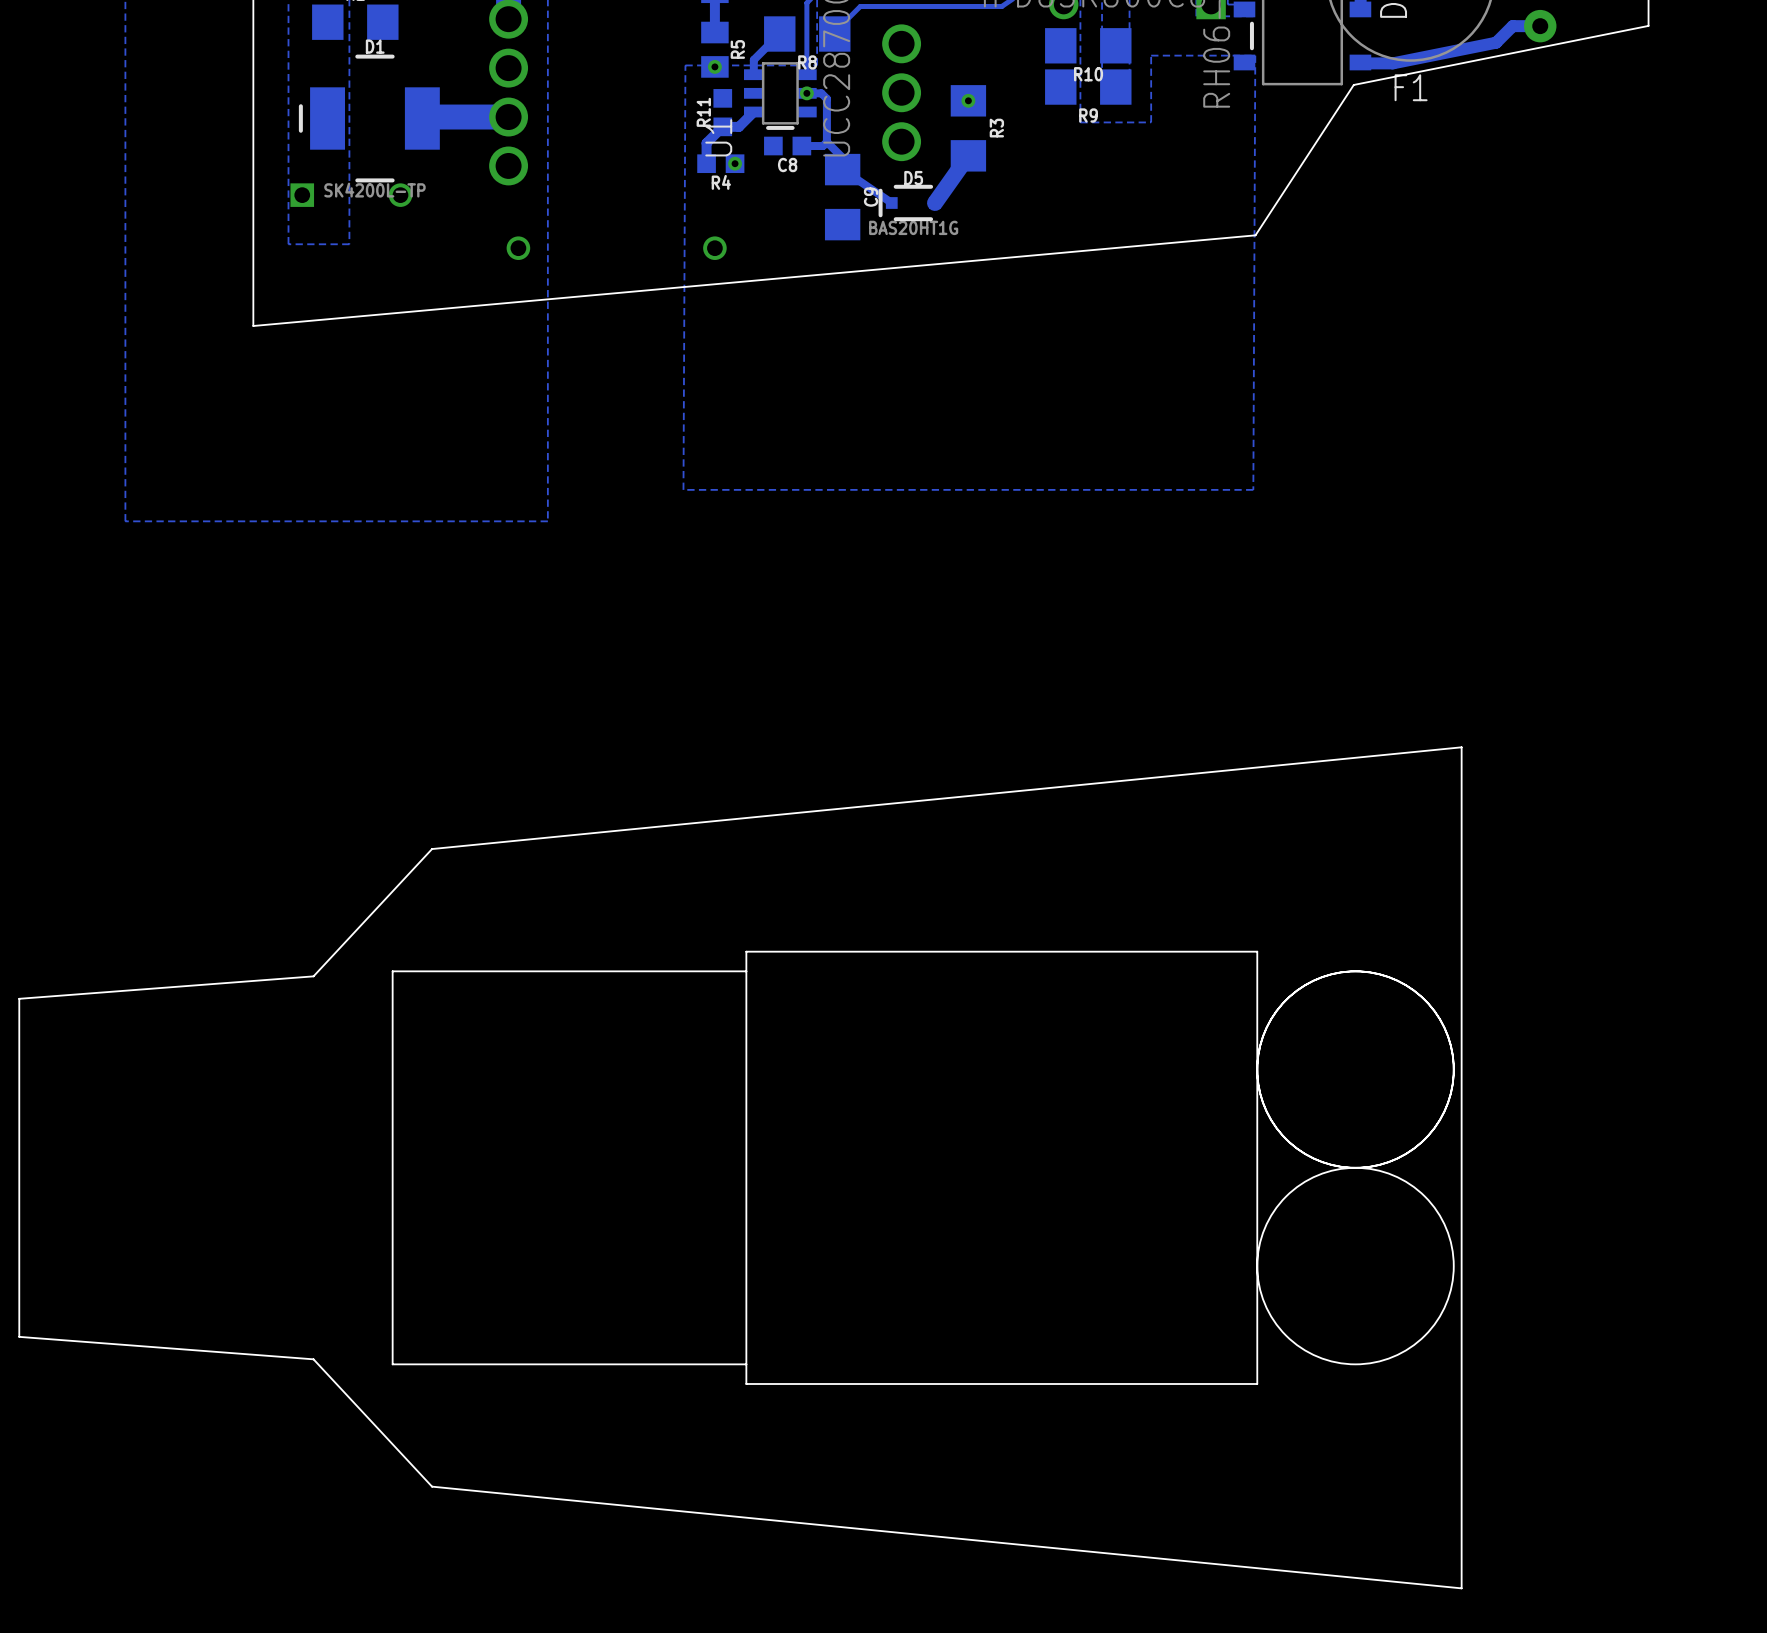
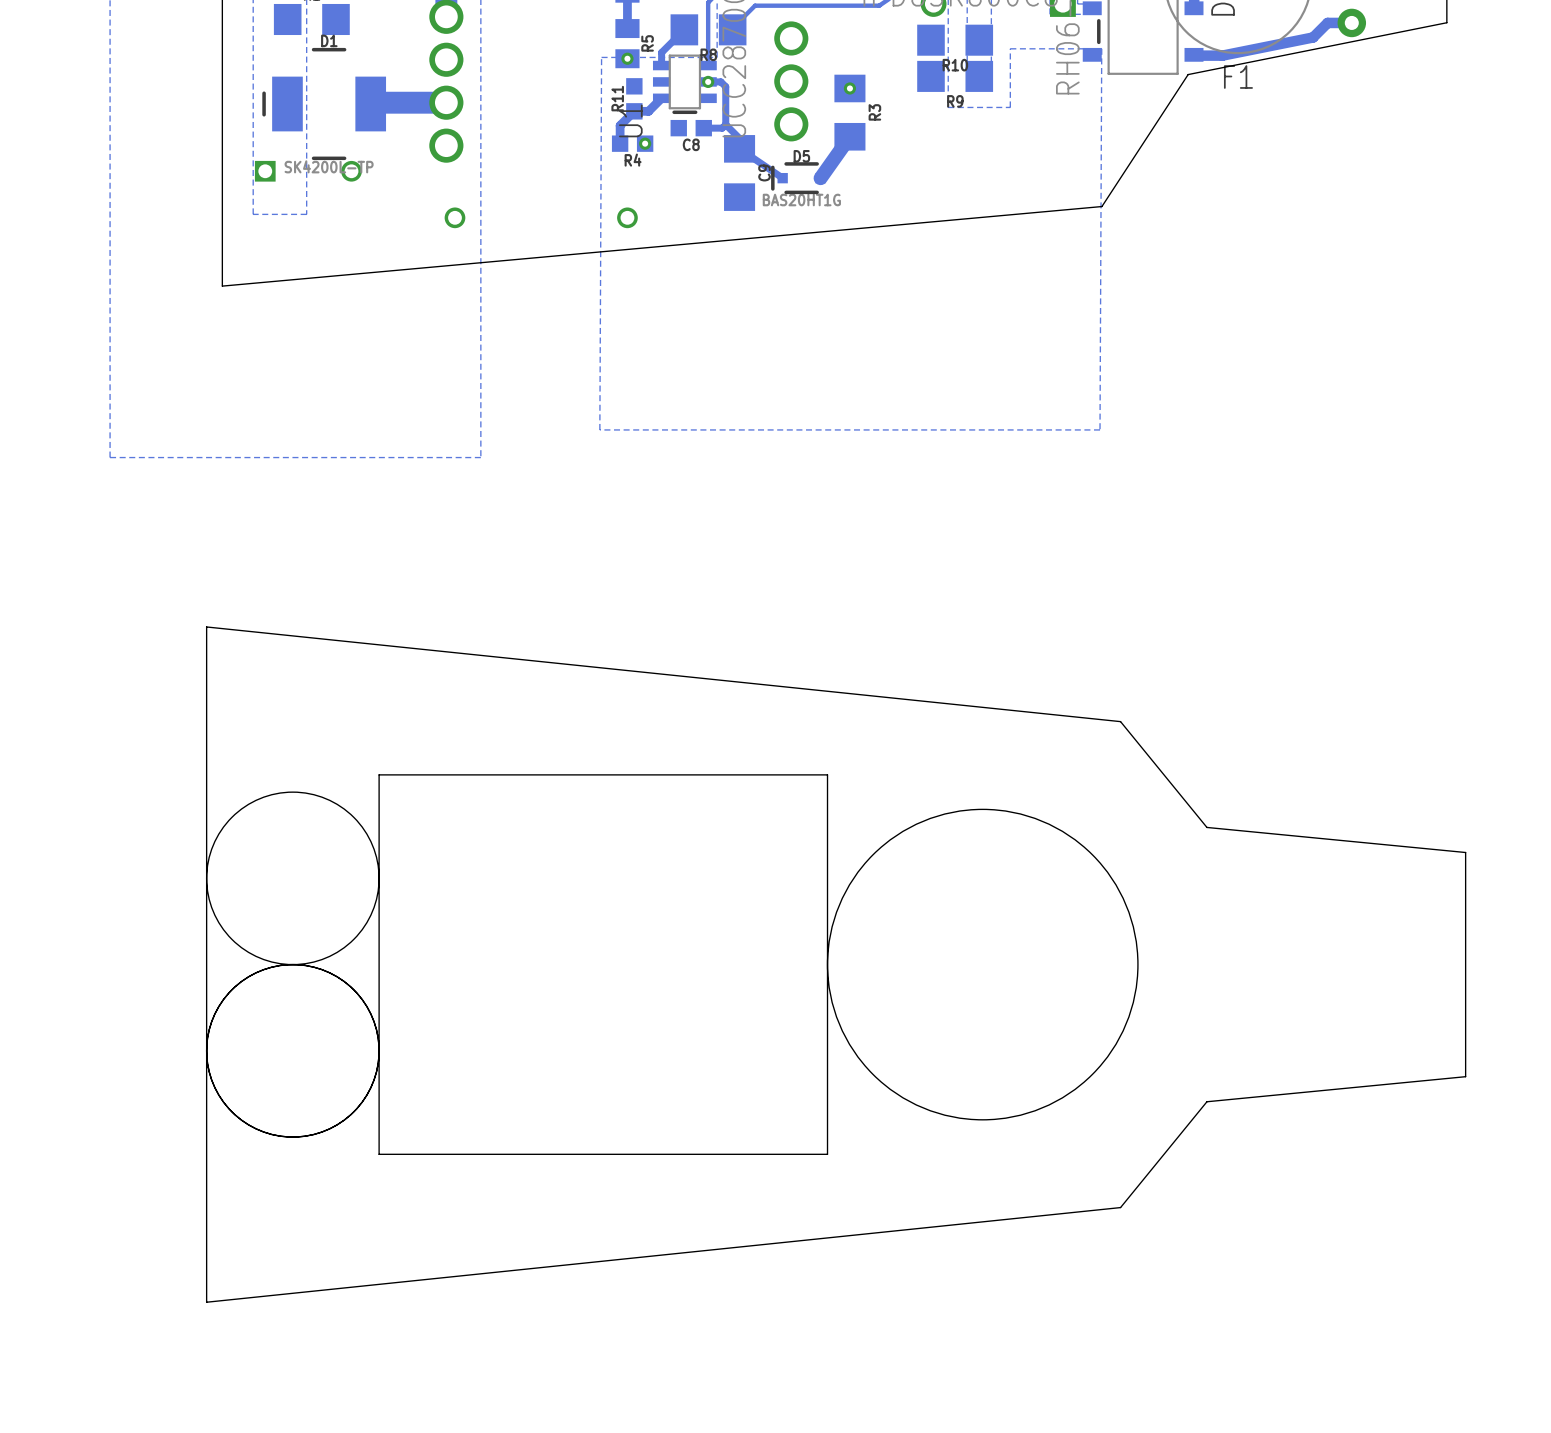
board edge: (1461, 747) (432, 849) (313, 976) (19, 998) (19, 1336) (313, 1359) (432, 1486) (1461, 1588) (1461, 747) -> (206, 626) (1120, 721) (1206, 827) (1465, 852) (1465, 1076) (1206, 1101) (1120, 1207) (206, 1302) (206, 626)
round board edge: none -> [206, 792, 380, 965]
round board edge: none -> [827, 809, 1138, 1120]
board edge: (1257, 951) (1257, 1384) (746, 1384) (746, 951) (1257, 951) -> (827, 774) (827, 1154) (379, 1154) (379, 774) (827, 774)
board edge: (746, 971) (392, 971) (392, 1364) (746, 1364) -> none
round board edge: [1257, 971, 1454, 1168] -> none
round board edge: none -> [206, 964, 380, 1138]
round board edge: [1257, 1167, 1454, 1365] -> none

